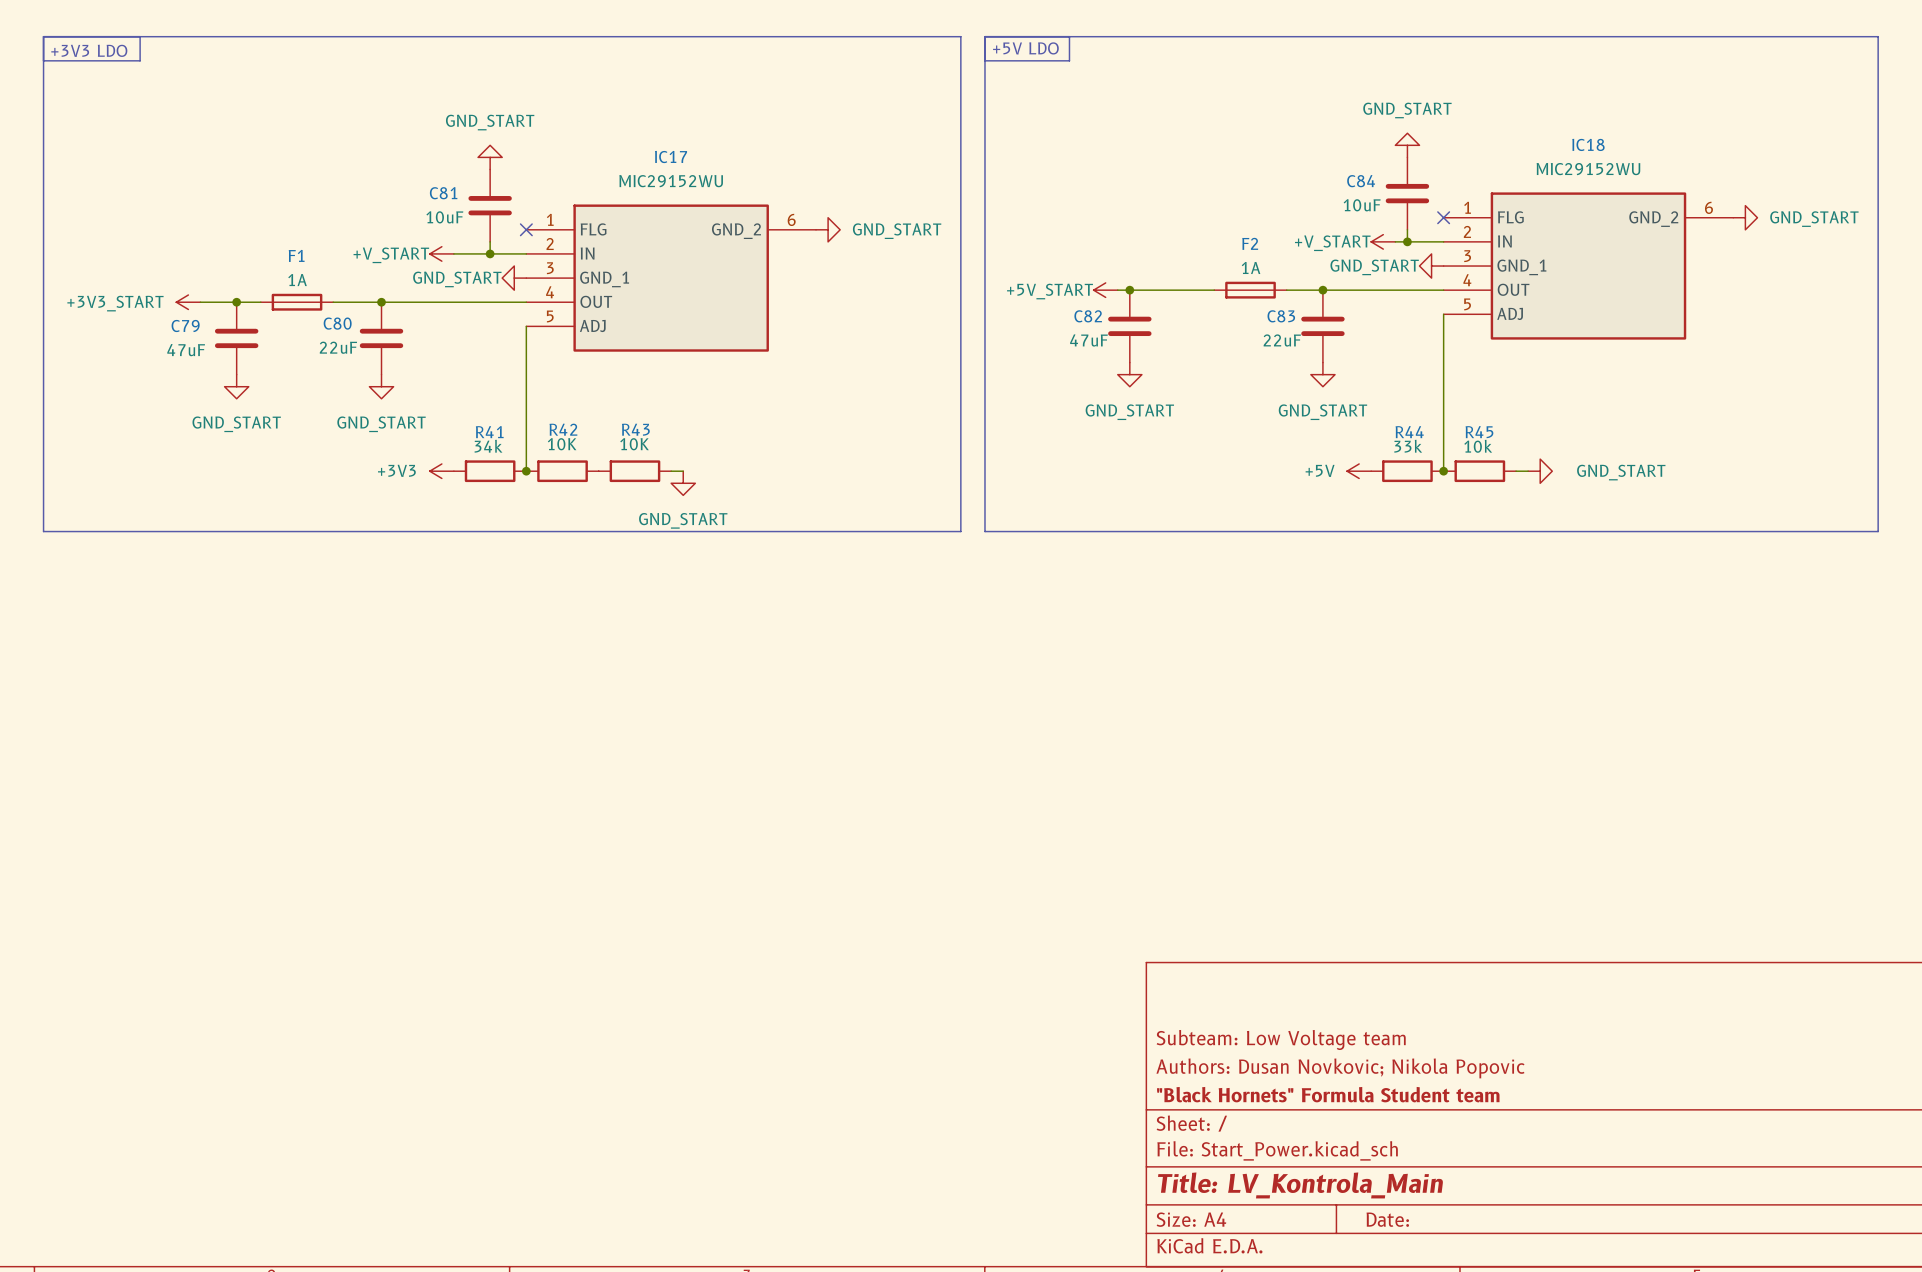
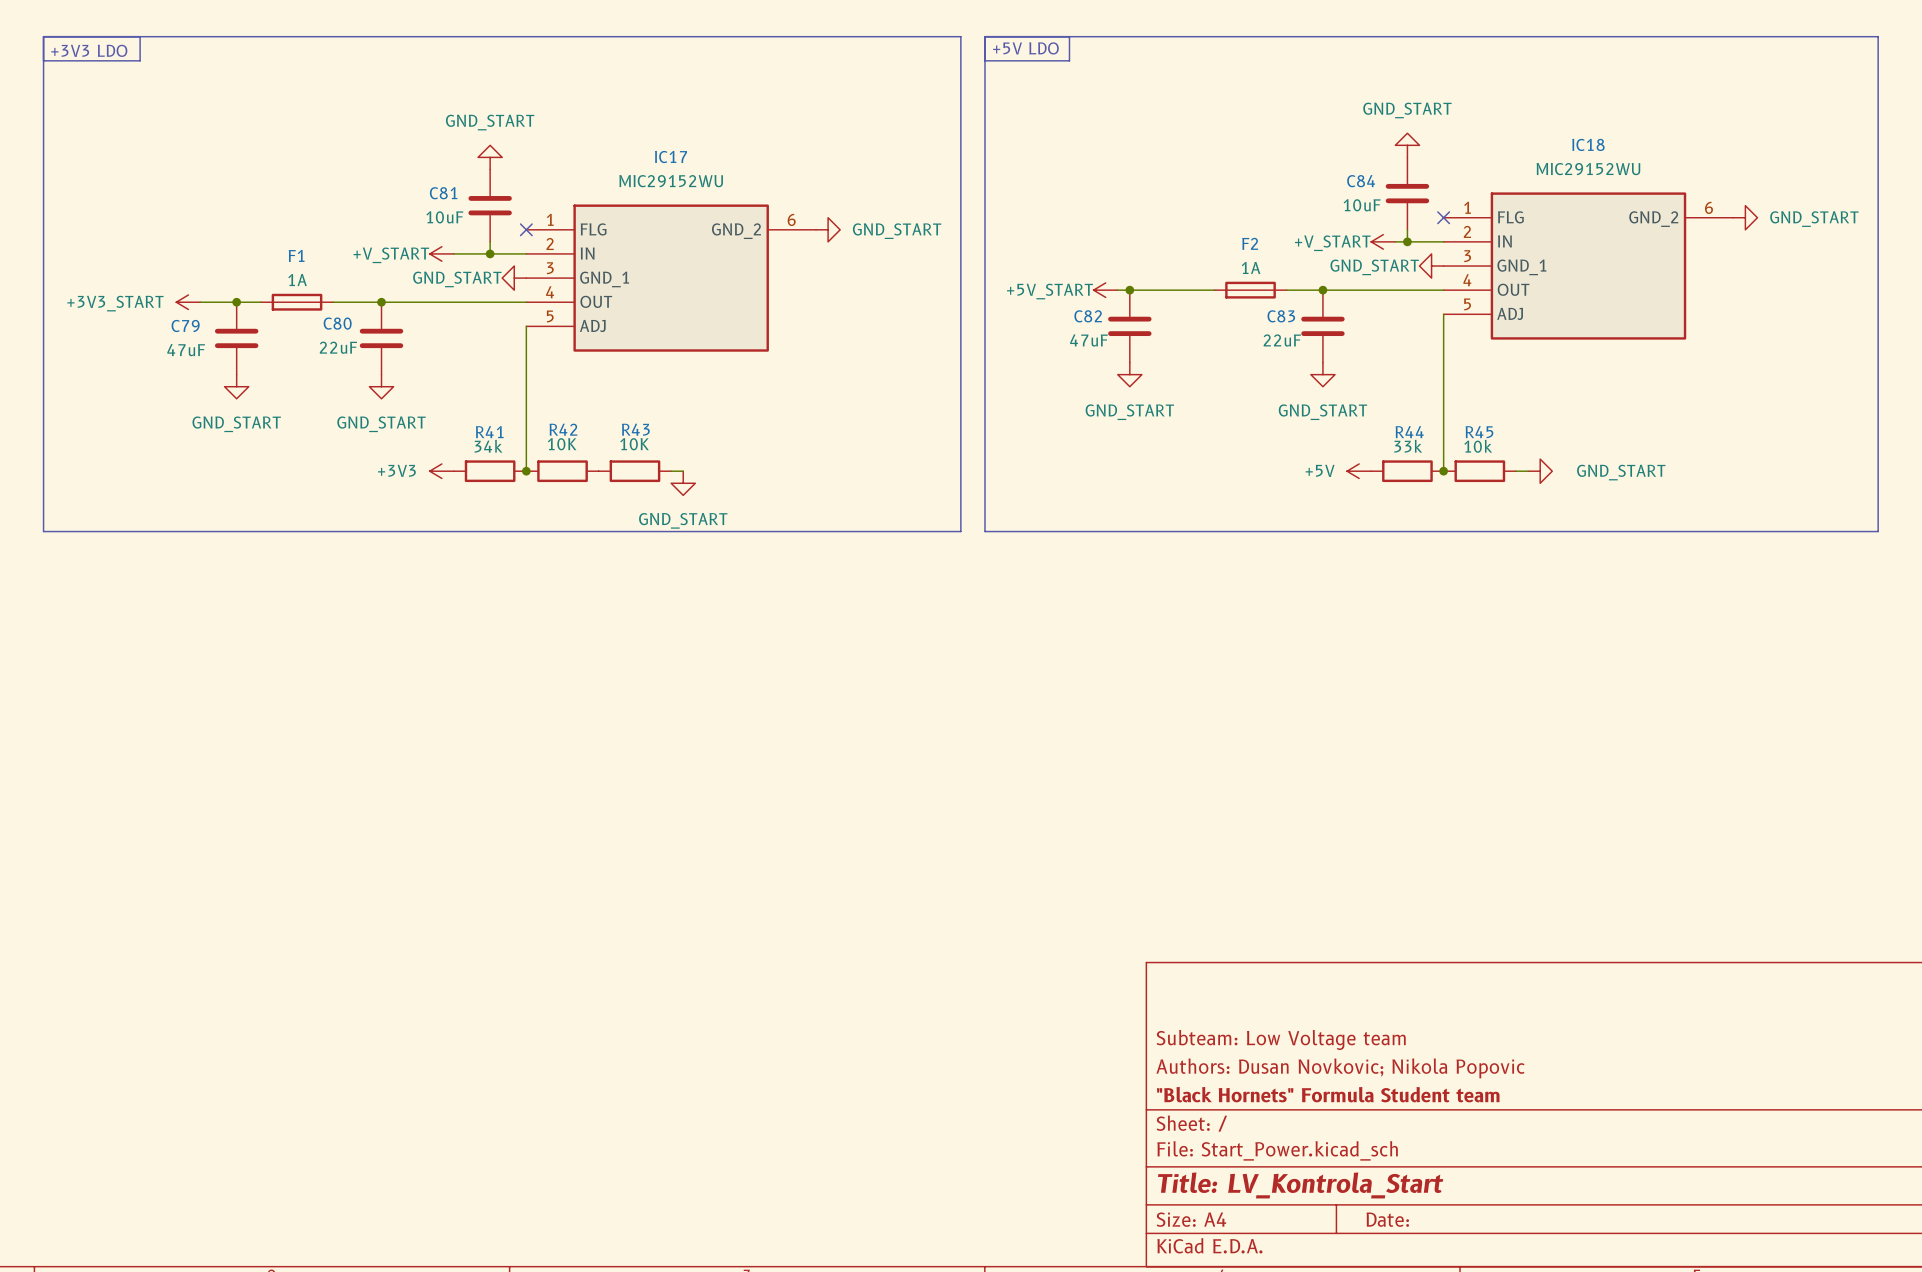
title block: Title: LV_Kontrola_Main (1300, 1185) -> Title: LV_Kontrola_Start (1300, 1185)

